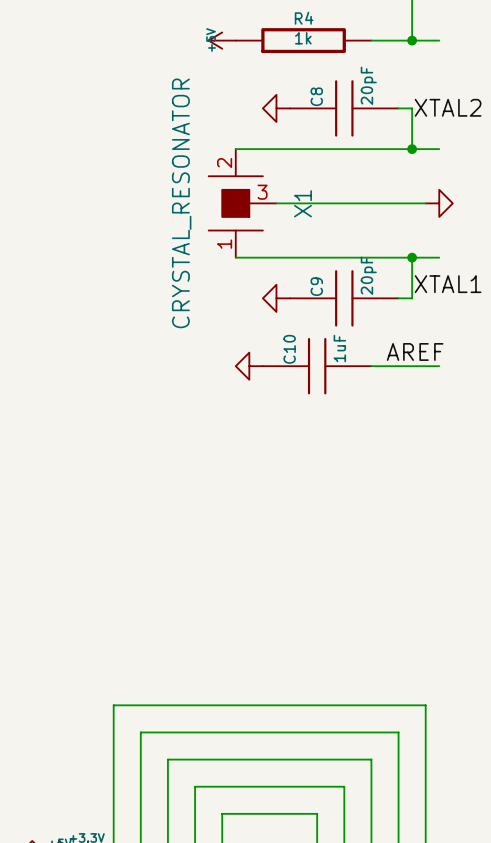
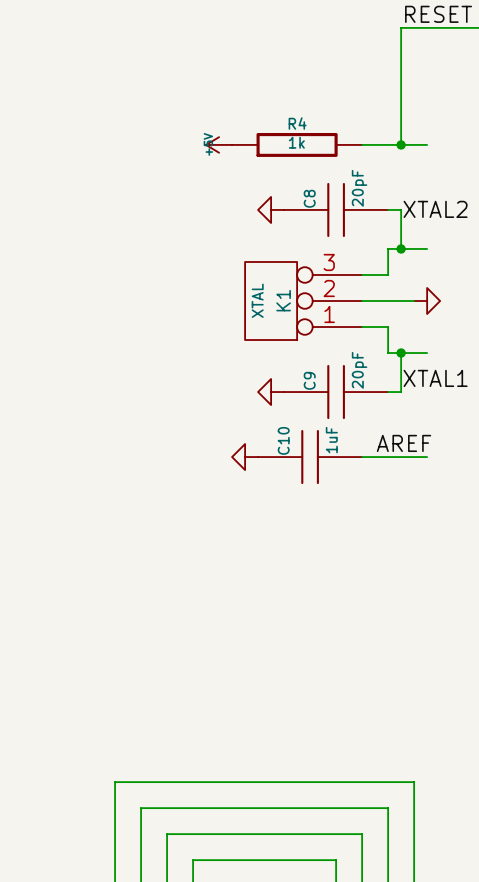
wire: (235, 149) (398, 149) -> (362, 274) (388, 274) (388, 248)
X1: CRYSTAL_RESONATOR (228, 203) -> none
K1: none -> XTAL (303, 301)
wire: (235, 257) (398, 257) -> (362, 327) (388, 327) (388, 353)

